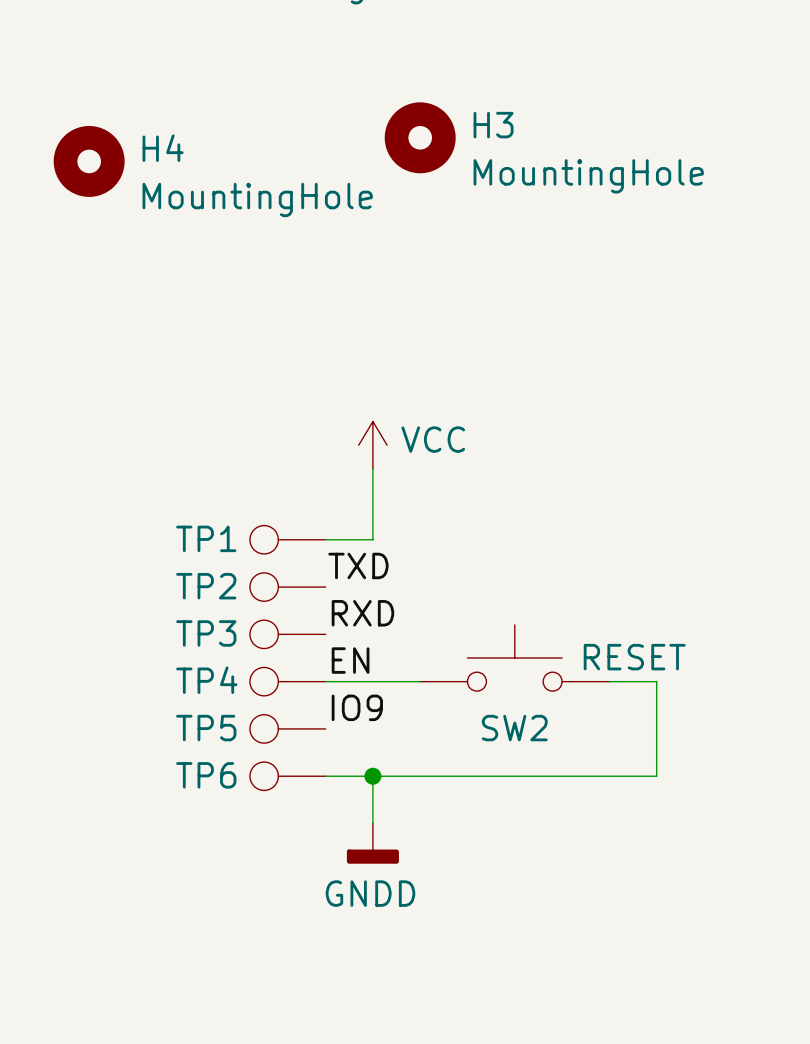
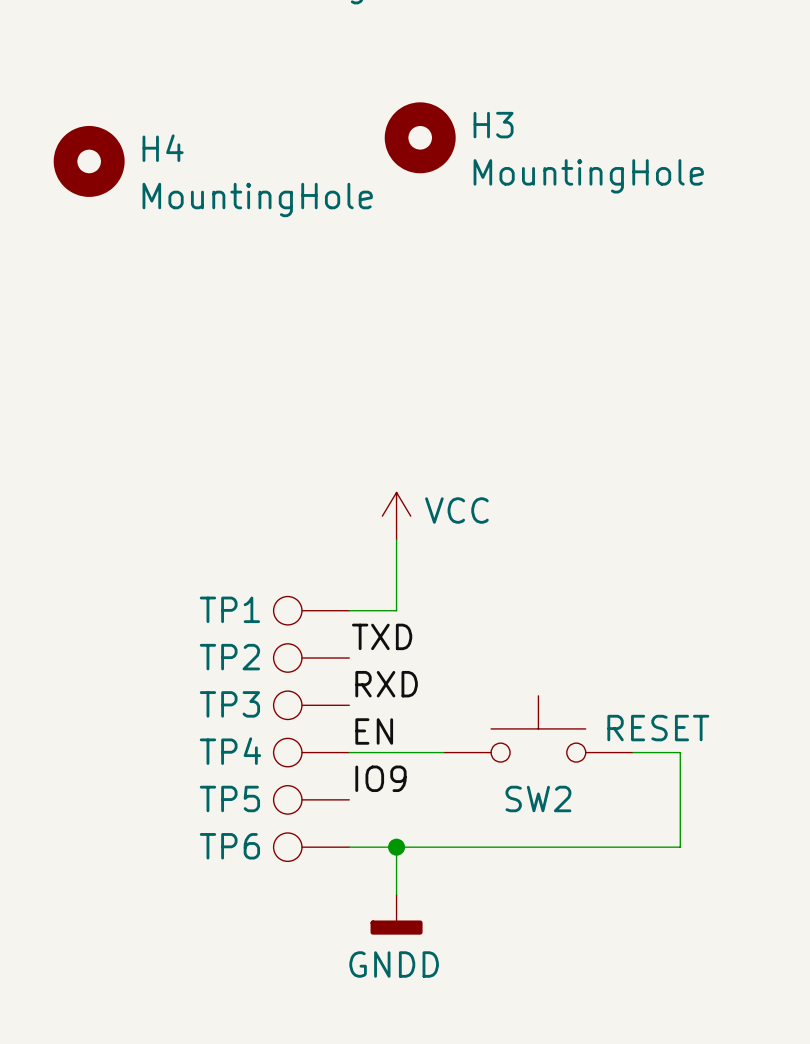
power symbol position: VCC (372, 445) -> VCC (396, 516)
wire: (372, 468) (372, 539) (325, 539) -> (396, 539) (396, 610) (349, 610)
TP1 position: (287, 539) -> (311, 610)
label position: TXD (358, 565) -> TXD (382, 636)
TP2 position: (287, 587) -> (311, 658)
label position: RXD (362, 613) -> RXD (386, 684)
TP3 position: (287, 634) -> (311, 705)
SW2 position: (514, 658) -> (538, 728)
label position: EN (350, 660) -> EN (374, 731)
TP4 position: (287, 681) -> (311, 752)
wire: (325, 681) (420, 681) -> (349, 752) (443, 752)
wire: (609, 681) (656, 681) (656, 776) (325, 776) -> (633, 752) (680, 752) (680, 847) (349, 847)
label position: IO9 (357, 707) -> IO9 (380, 778)
TP5 position: (287, 728) -> (311, 799)
TP6 position: (287, 776) -> (311, 847)
wire: (372, 776) (372, 823) -> (396, 847) (396, 894)
junction position: (372, 776) -> (396, 847)
power symbol position: GNDD (372, 843) -> GNDD (396, 914)

